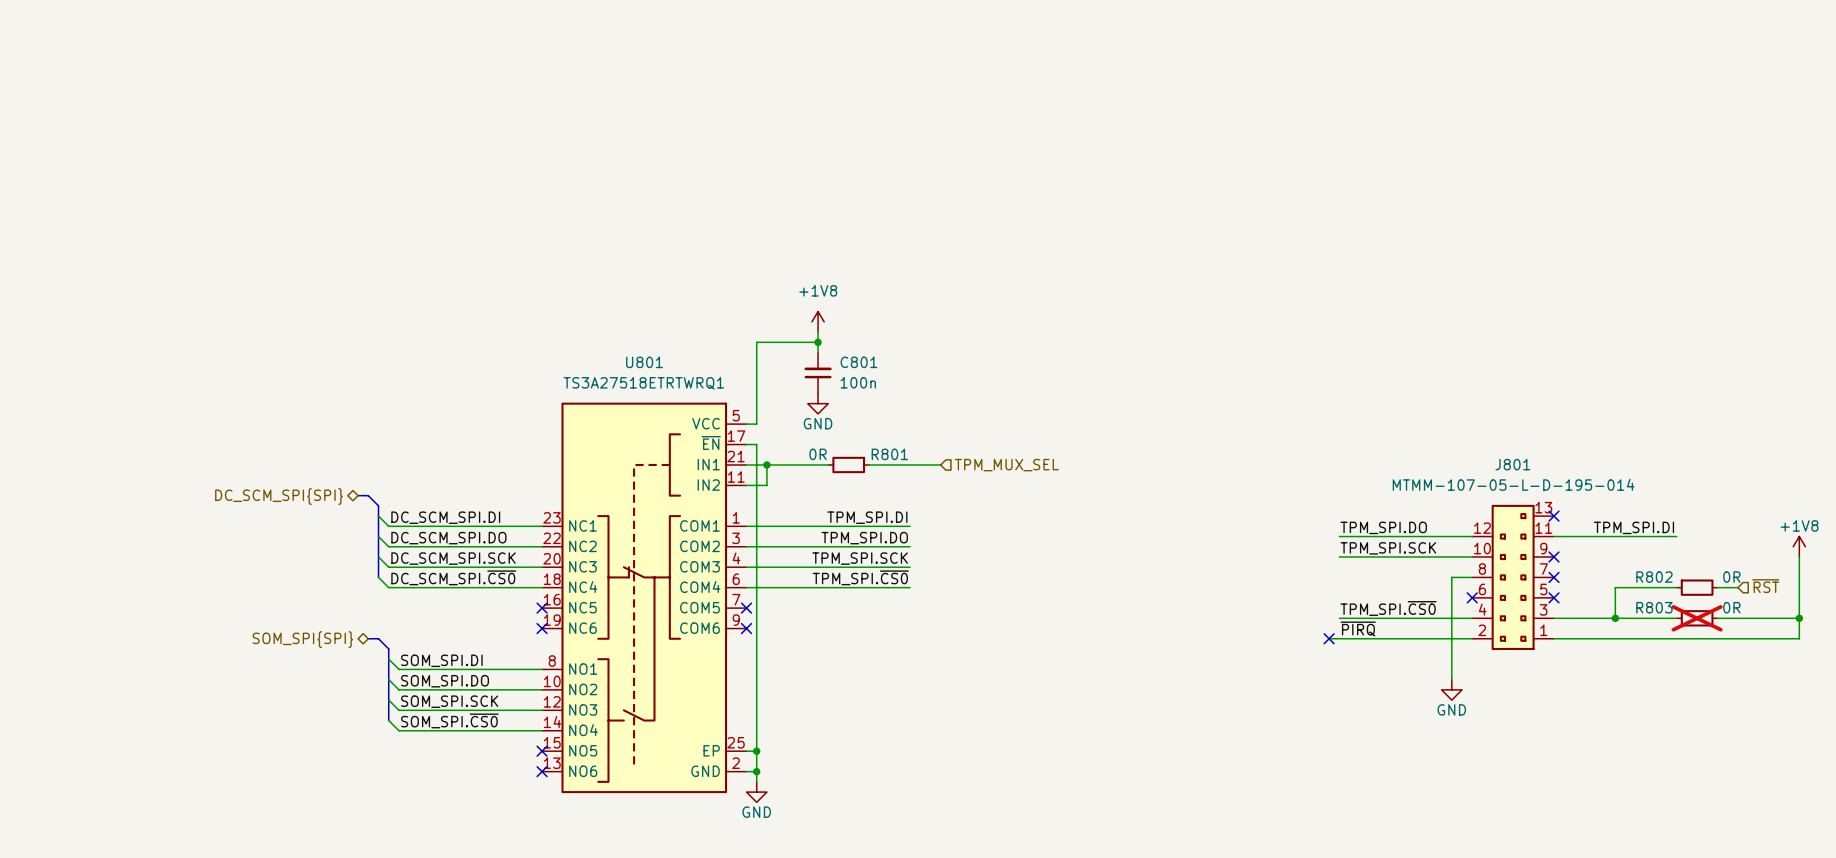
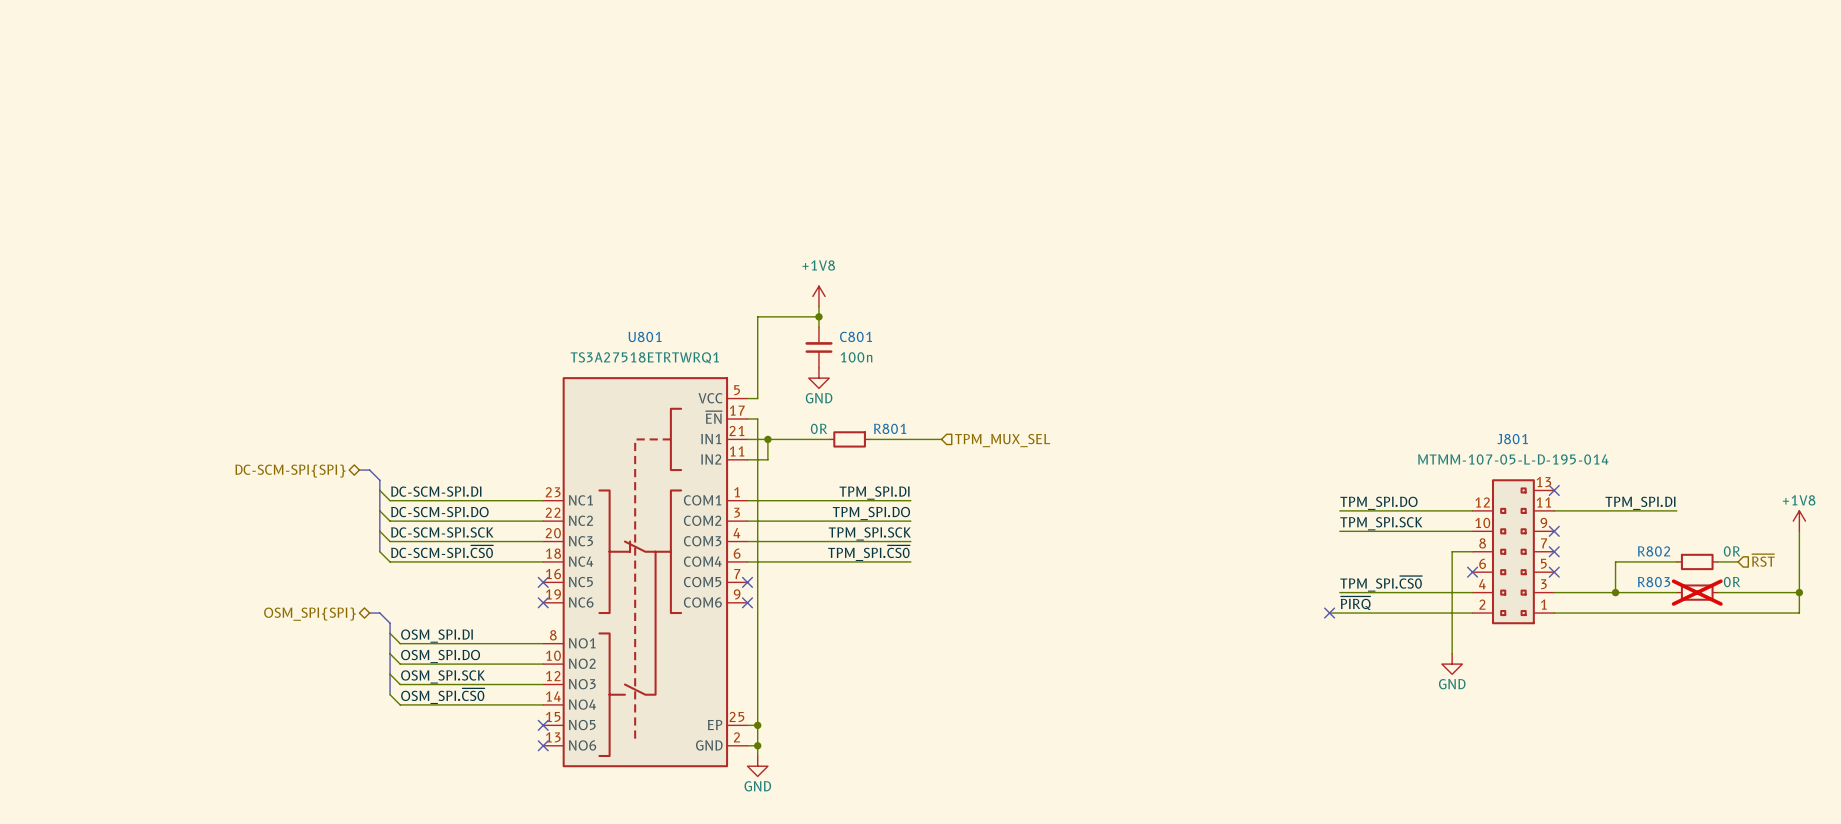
hierarchical label: DC_SCM_SPI{SPI} (279, 496) -> DC-SCM-SPI{SPI} (290, 471)
label: DC_SCM_SPI.DI (445, 517) -> DC-SCM-SPI.DI (436, 491)
label: DC_SCM_SPI.DO (448, 538) -> DC-SCM-SPI.DO (439, 512)
label: DC_SCM_SPI.SCK (453, 558) -> DC-SCM-SPI.SCK (442, 532)
label: DC_SCM_SPI.~{CS0} (453, 577) -> DC-SCM-SPI.~{CS0} (442, 551)
hierarchical label: SOM_SPI{SPI} (302, 639) -> OSM_SPI{SPI} (309, 614)
label: SOM_SPI.DI (441, 660) -> OSM_SPI.DI (436, 636)
label: SOM_SPI.DO (445, 681) -> OSM_SPI.DO (440, 656)
label: SOM_SPI.SCK (449, 701) -> OSM_SPI.SCK (442, 676)
label: SOM_SPI.~{CS0} (449, 720) -> OSM_SPI.~{CS0} (442, 696)

